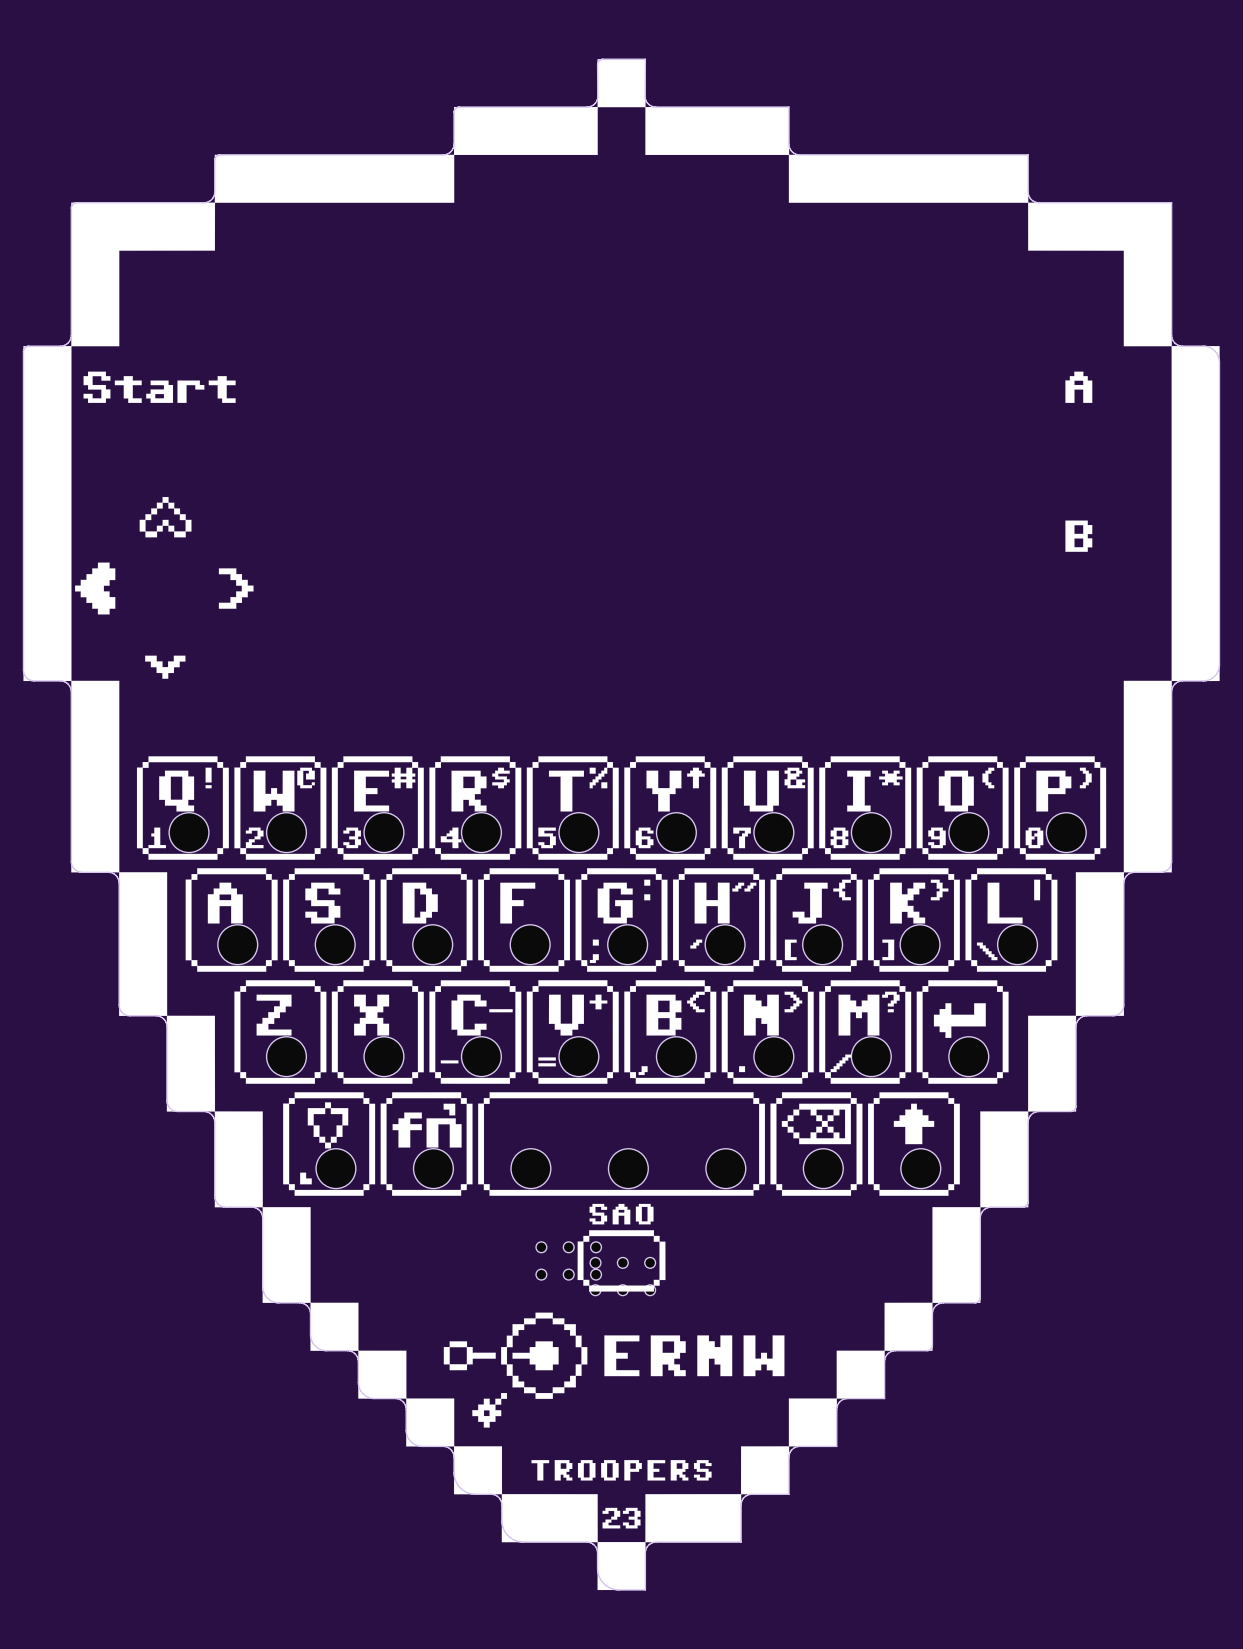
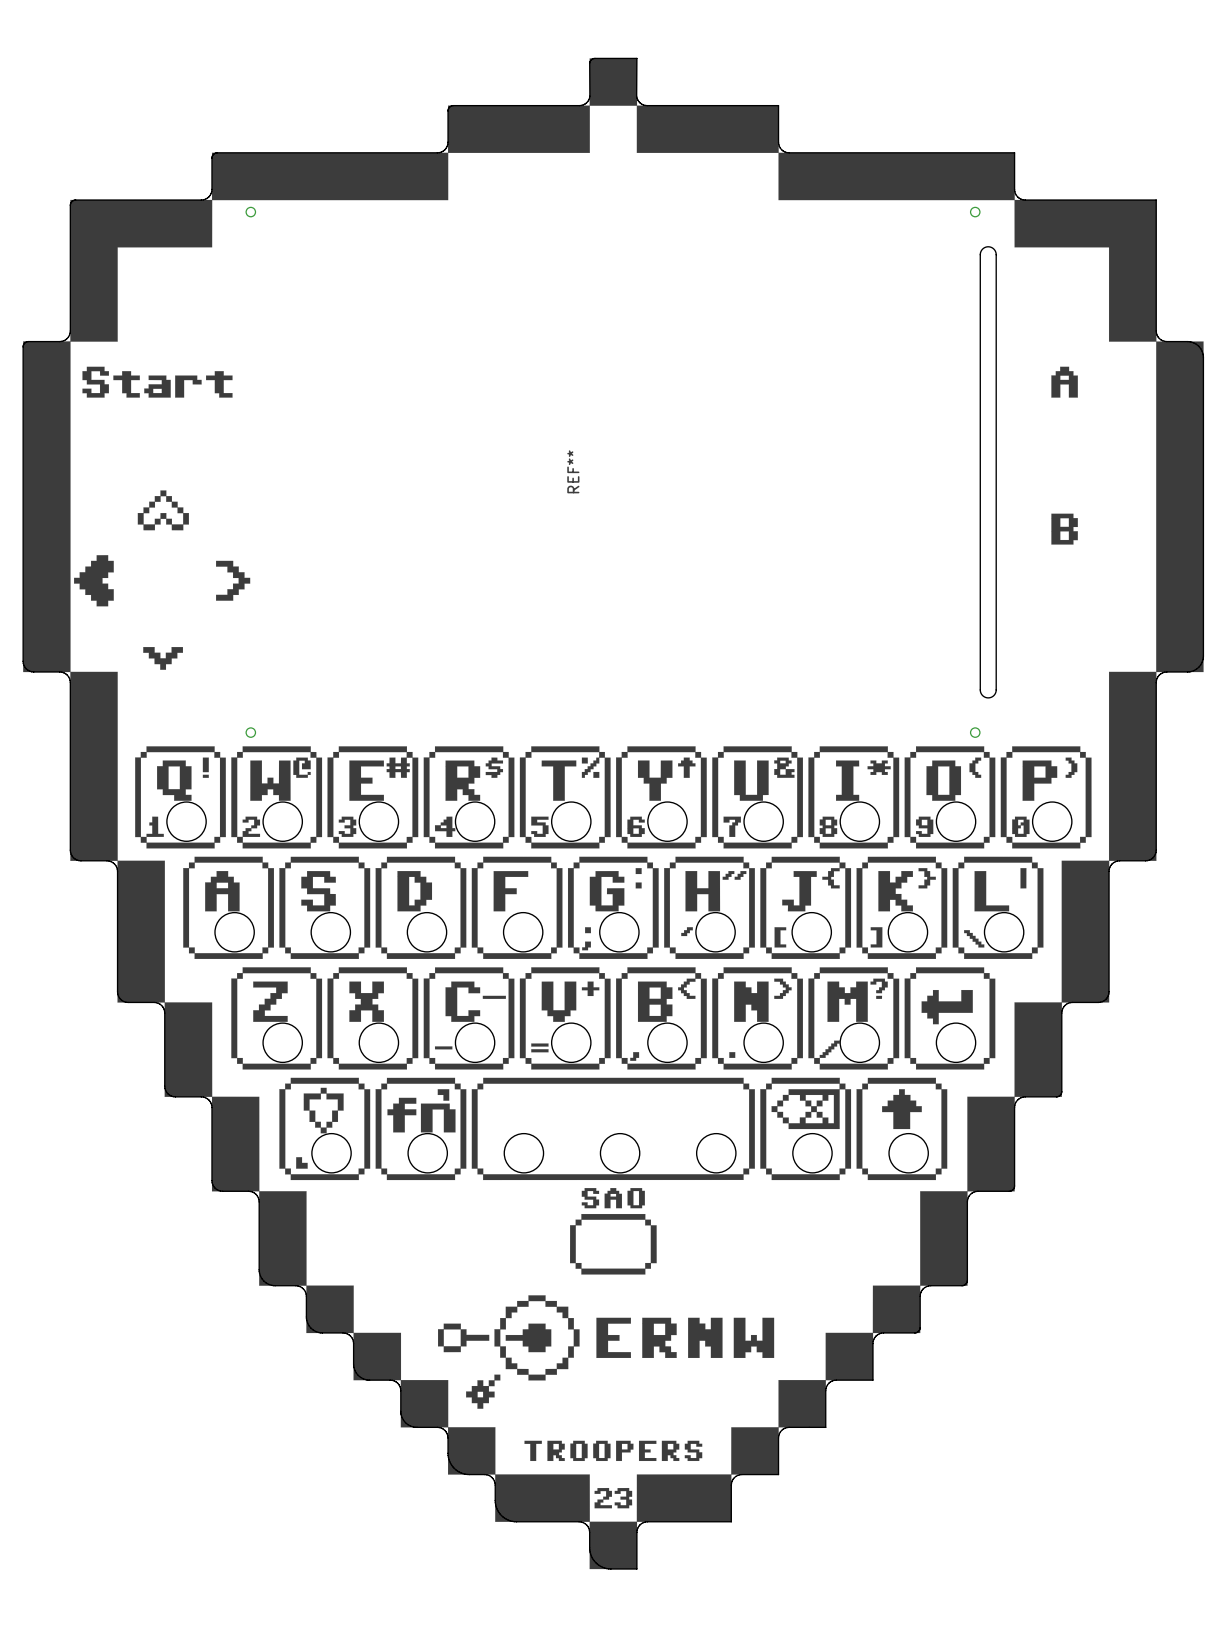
REF**: none -> (621, 472)
part: (568, 1260) -> none
part: (622, 1276) -> none

